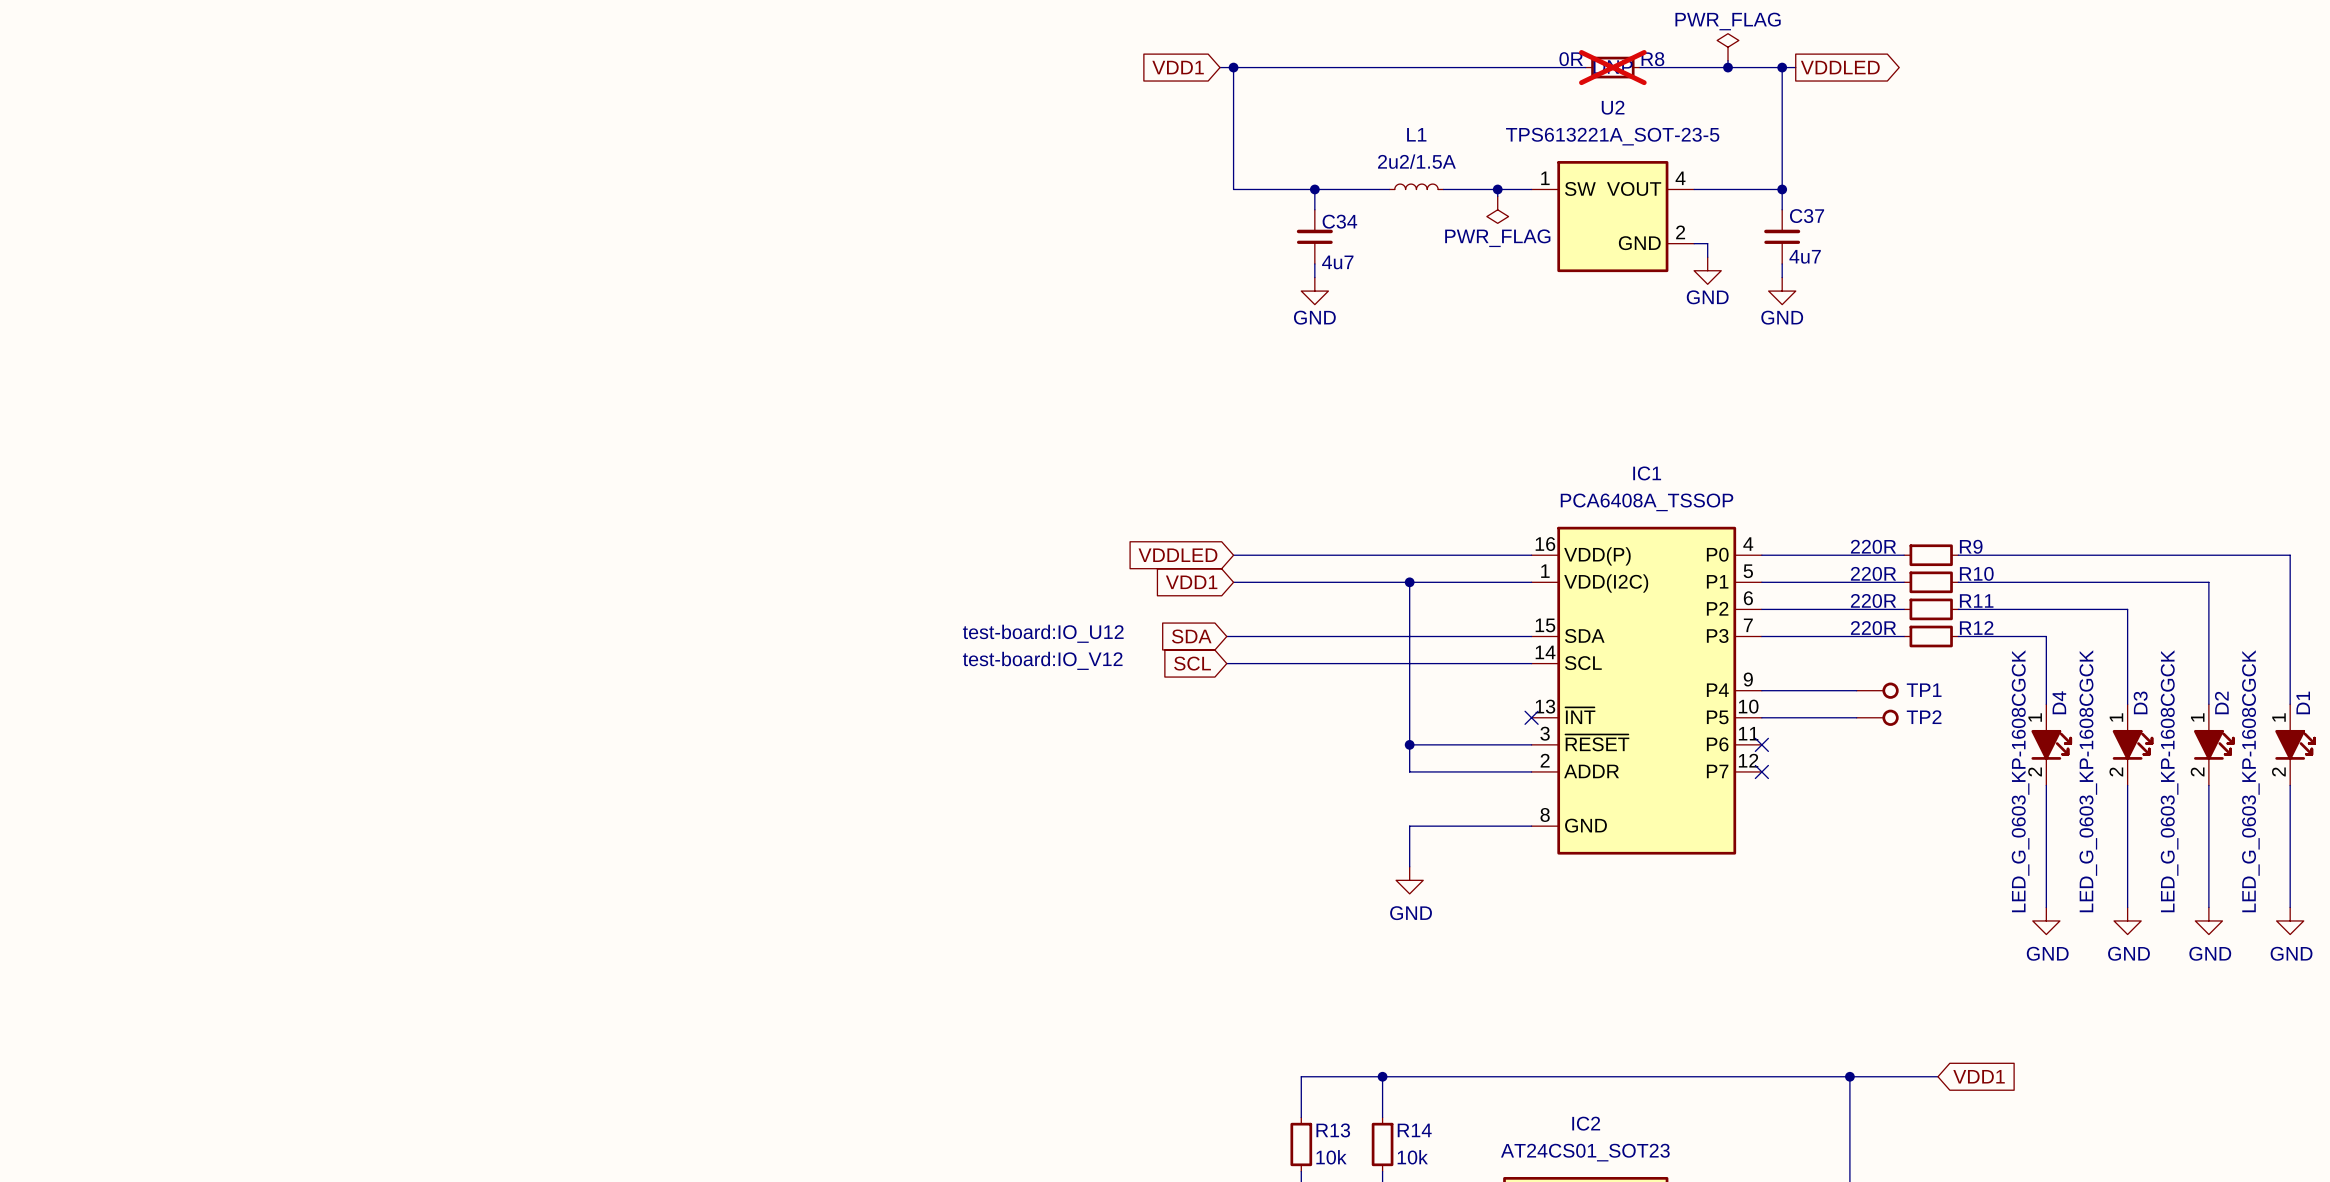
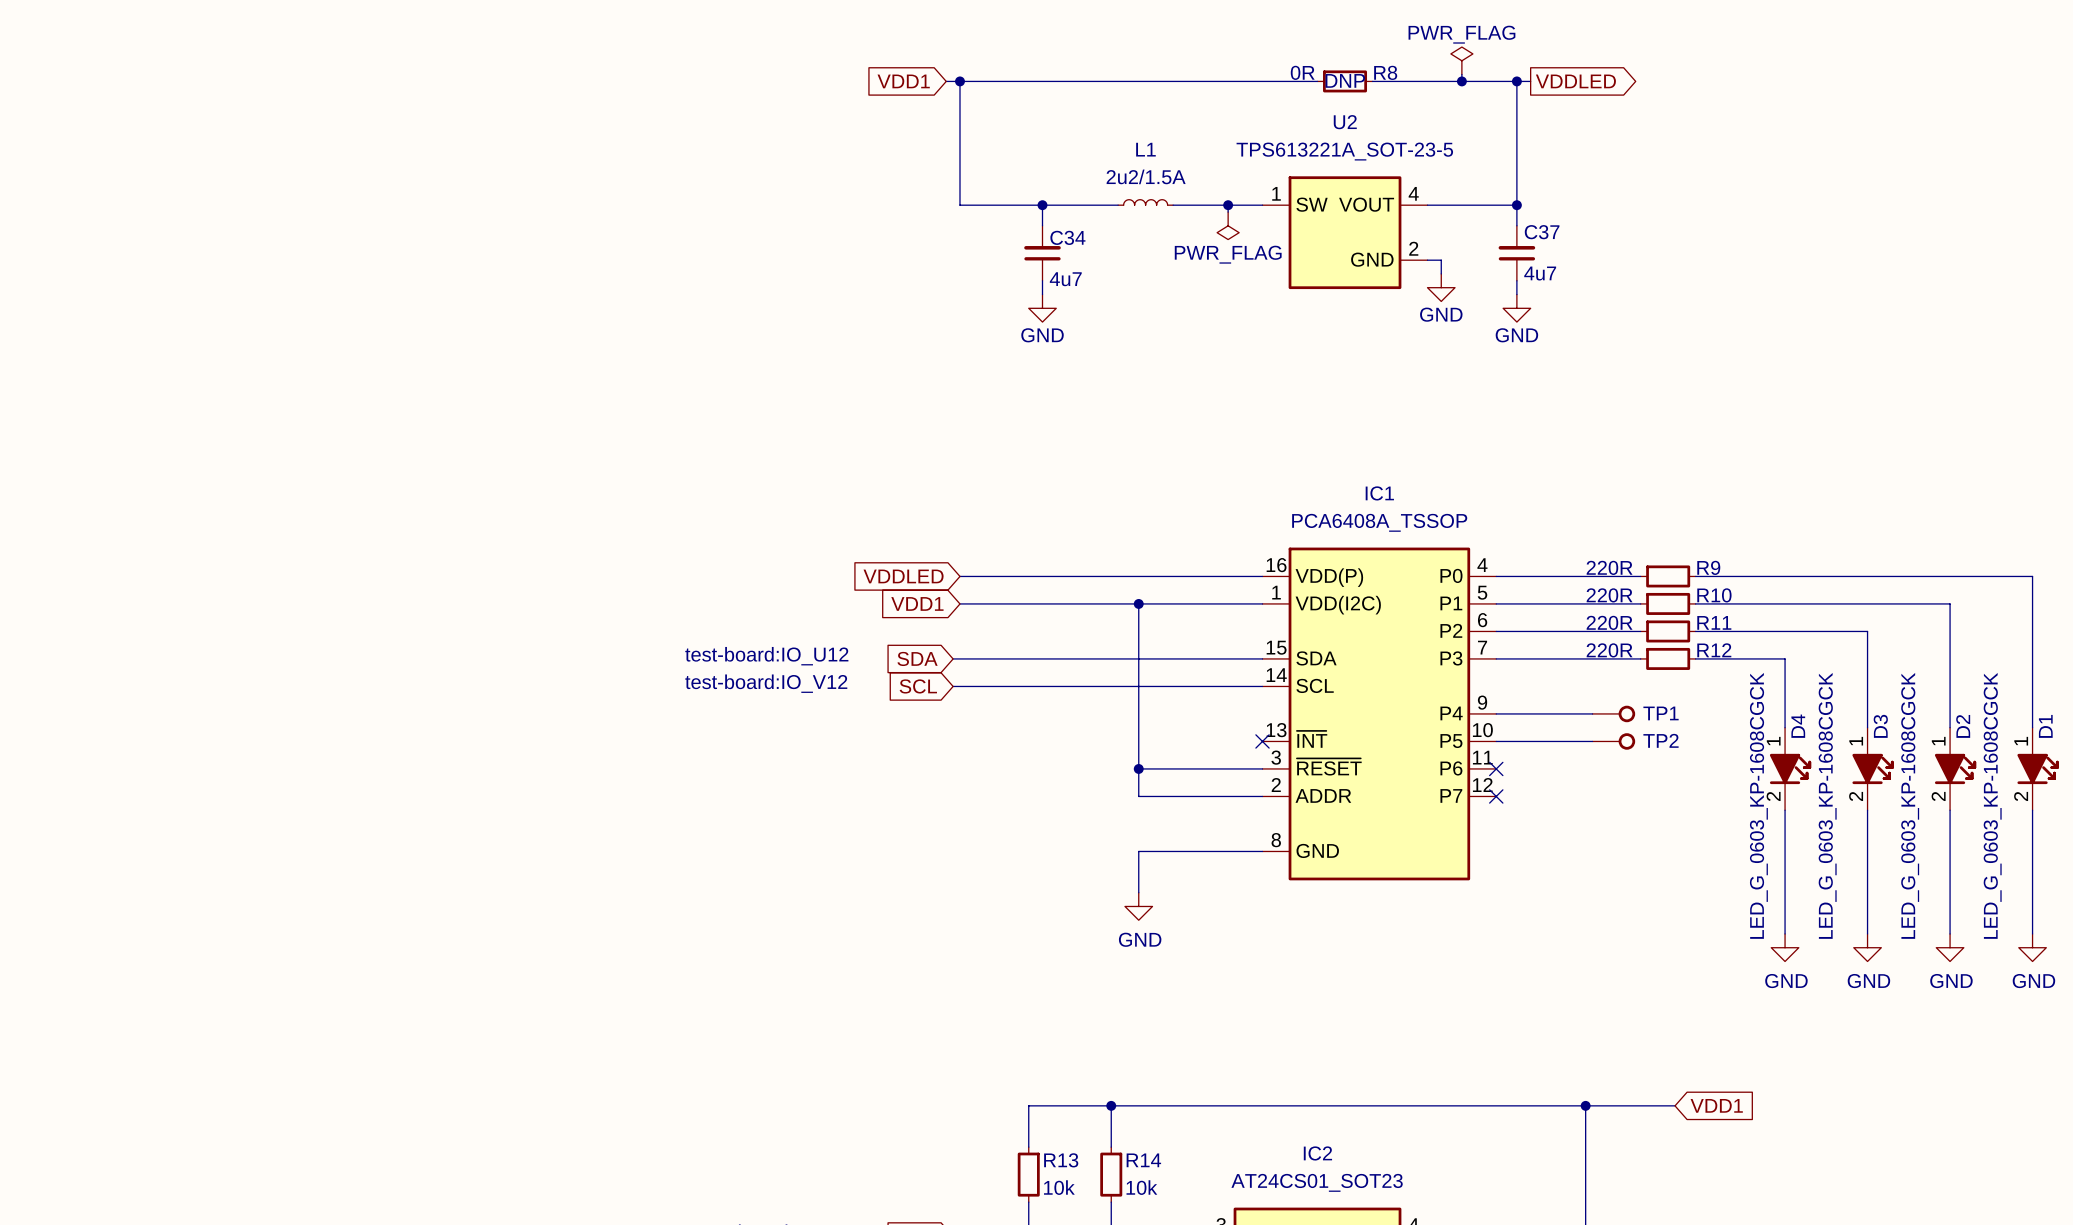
R8 do-not-place cross: (1612, 67) -> none

